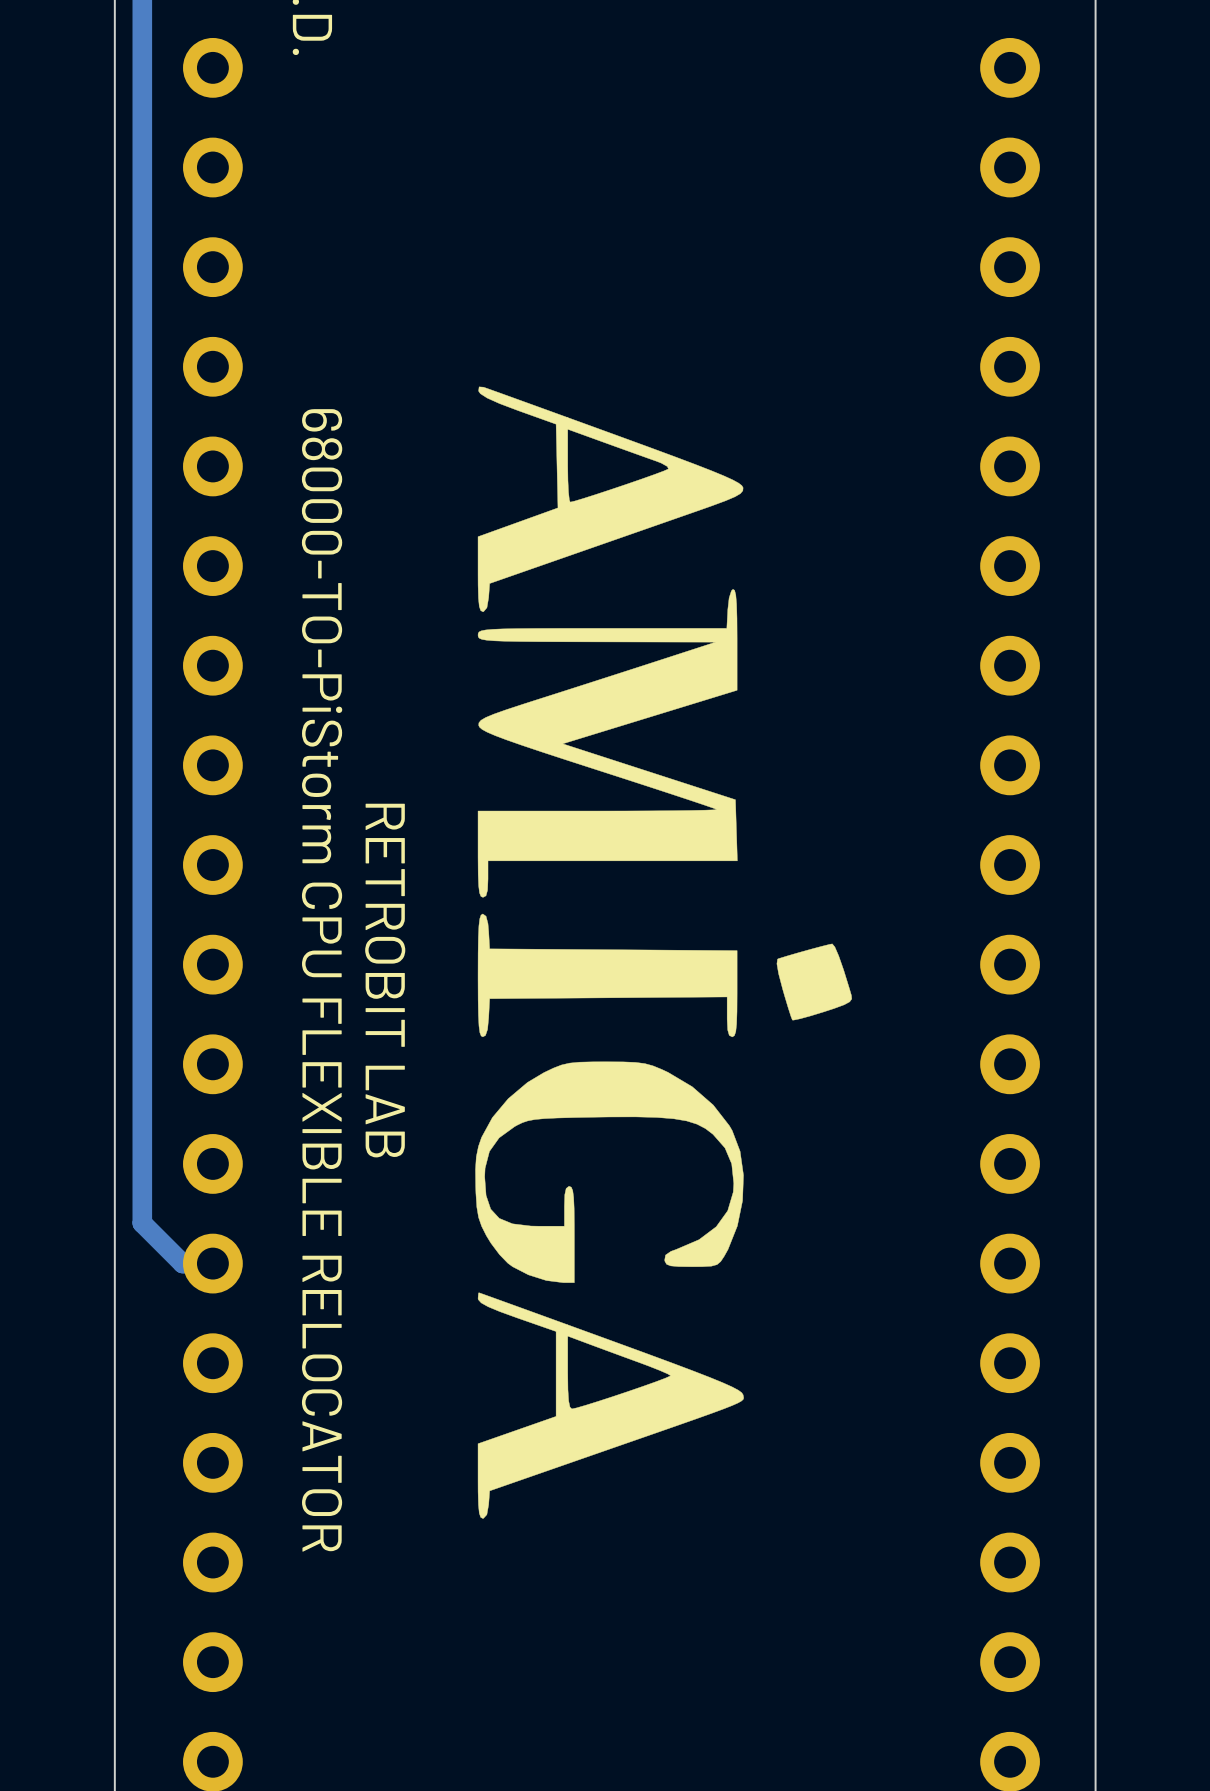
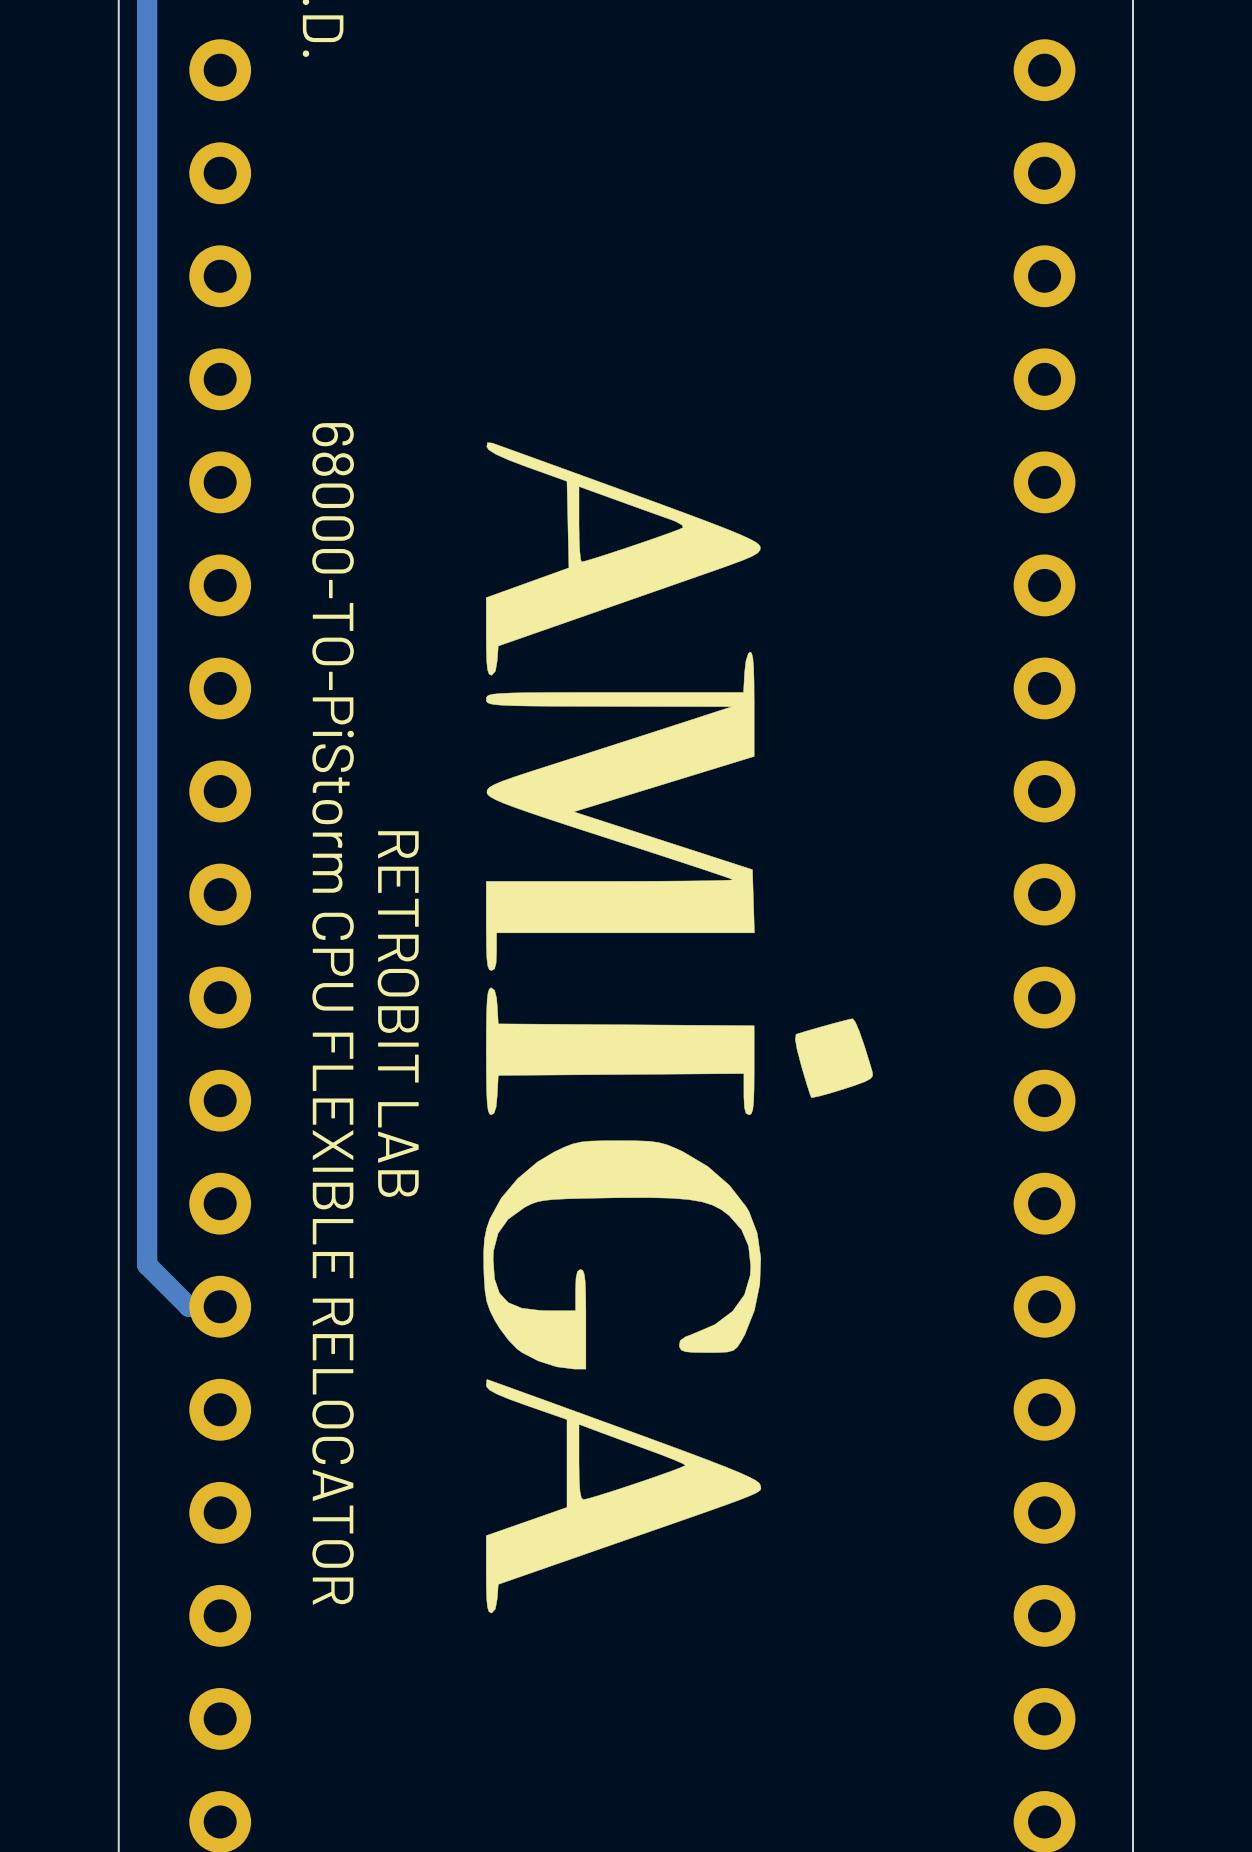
drawing position: (663, 952) -> (678, 1027)

